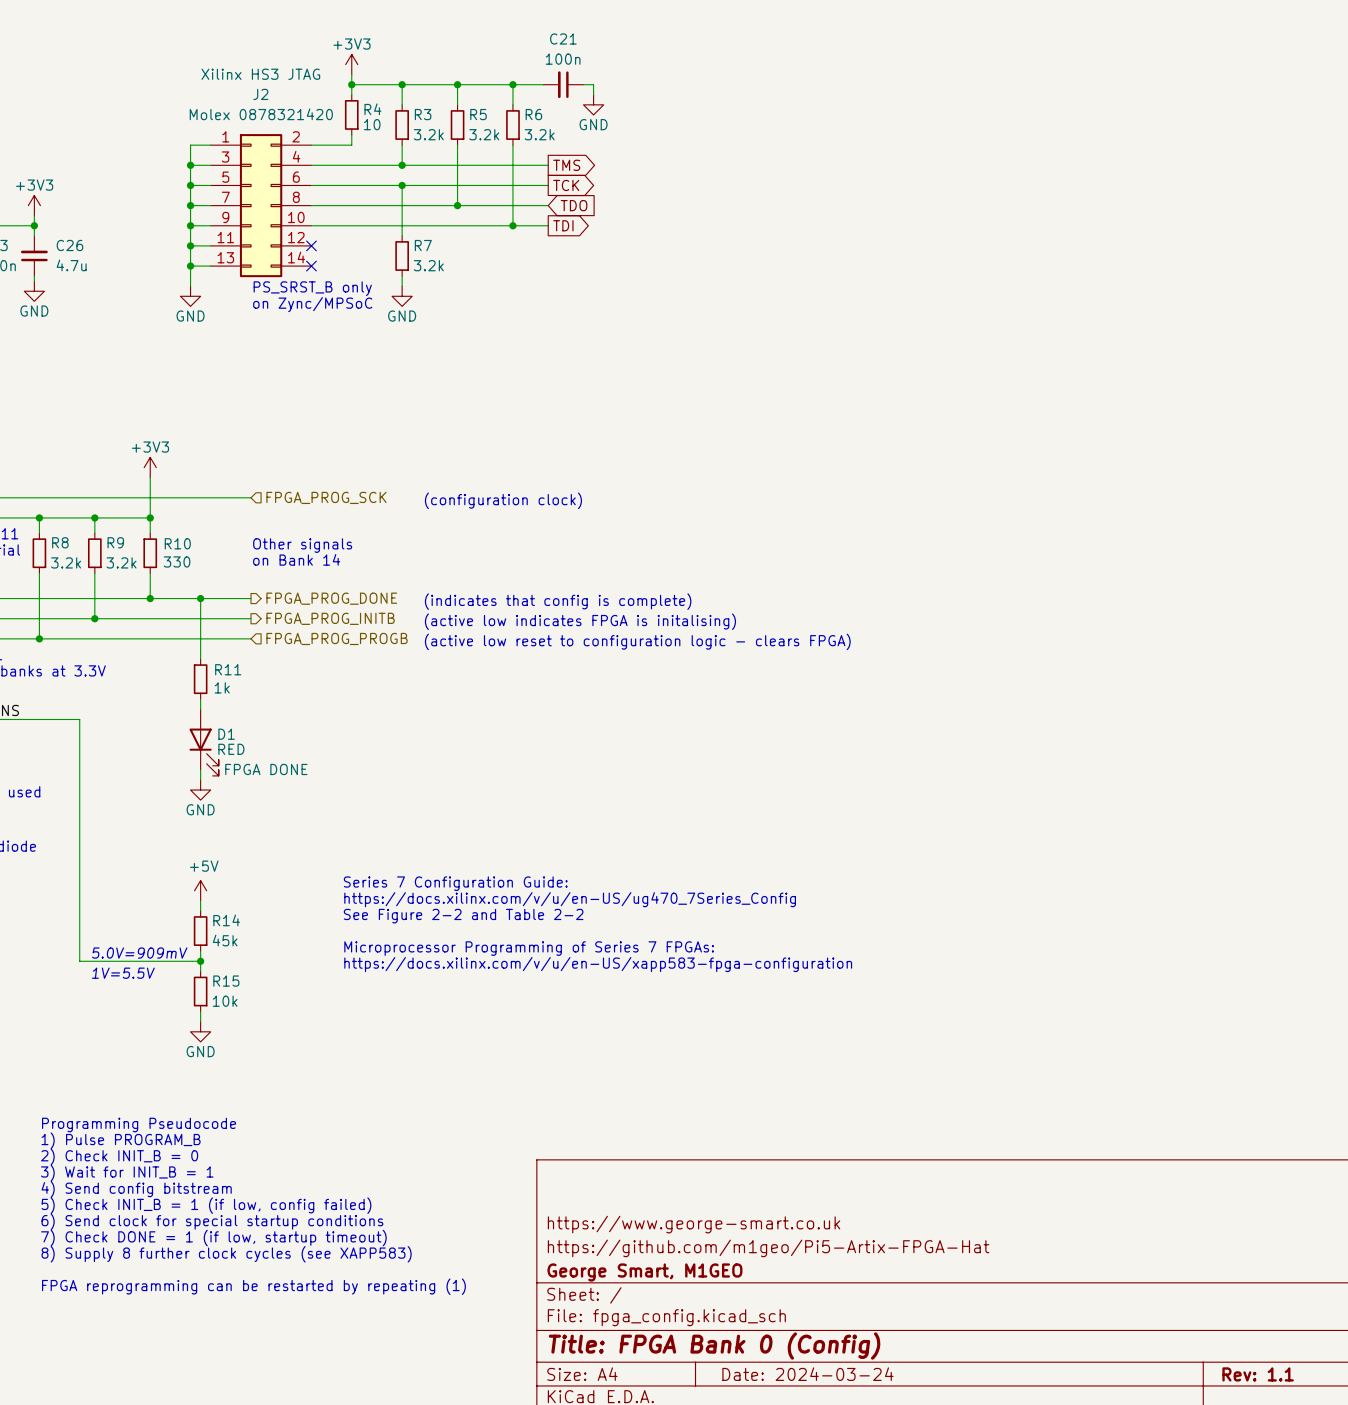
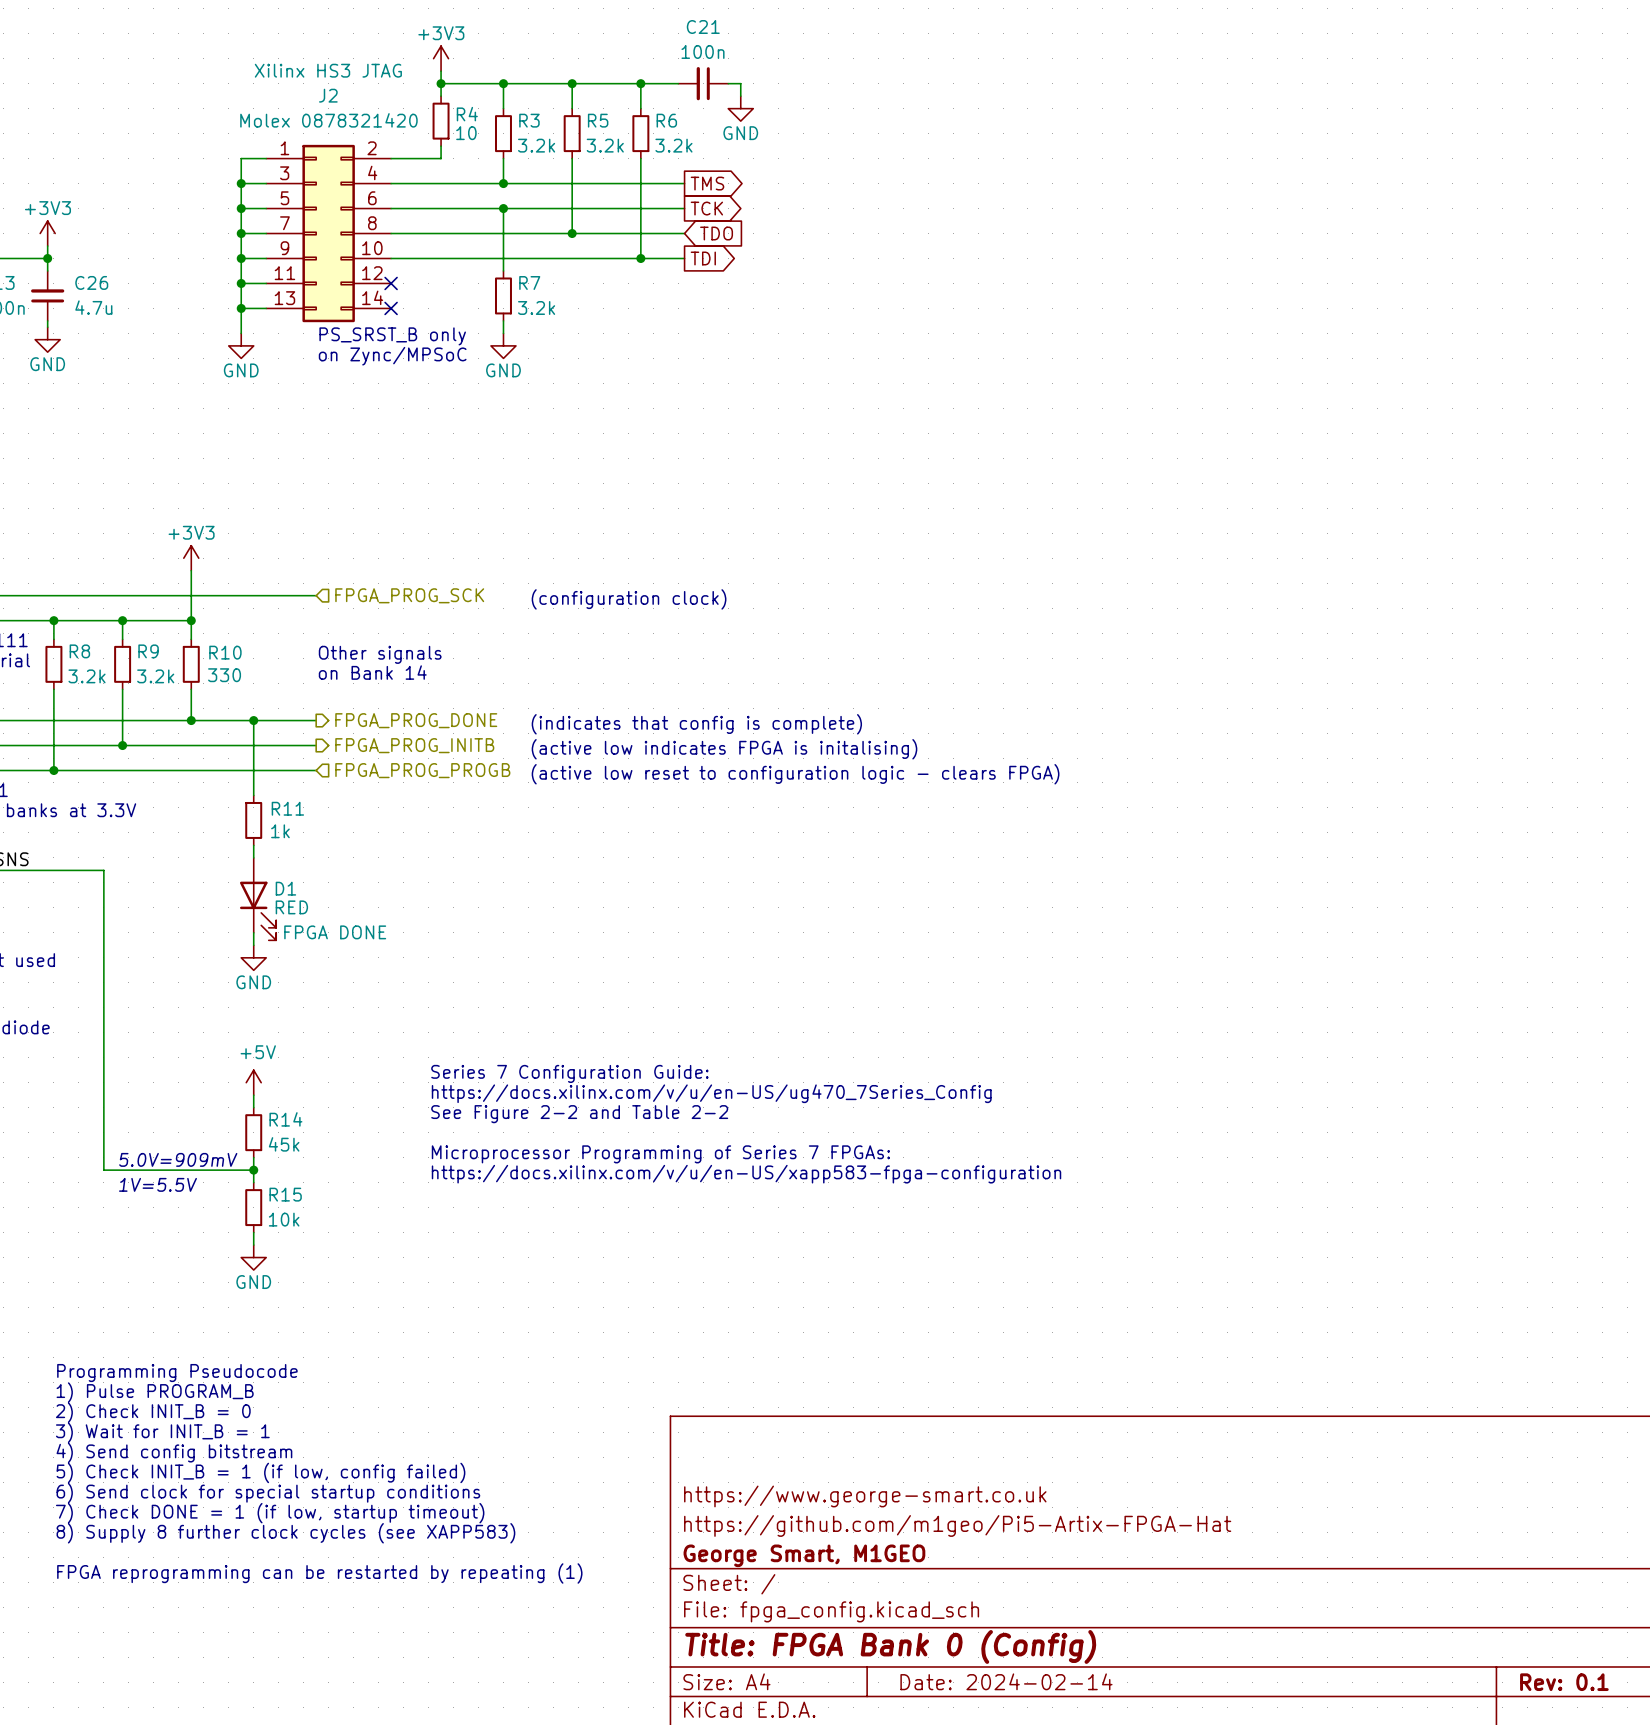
title block: Date: 2024-03-24 (807, 1374) -> Date: 2024-02-14 (1006, 1681)
title block: Rev: 1.1 (1258, 1374) -> Rev: 0.1 (1564, 1682)

